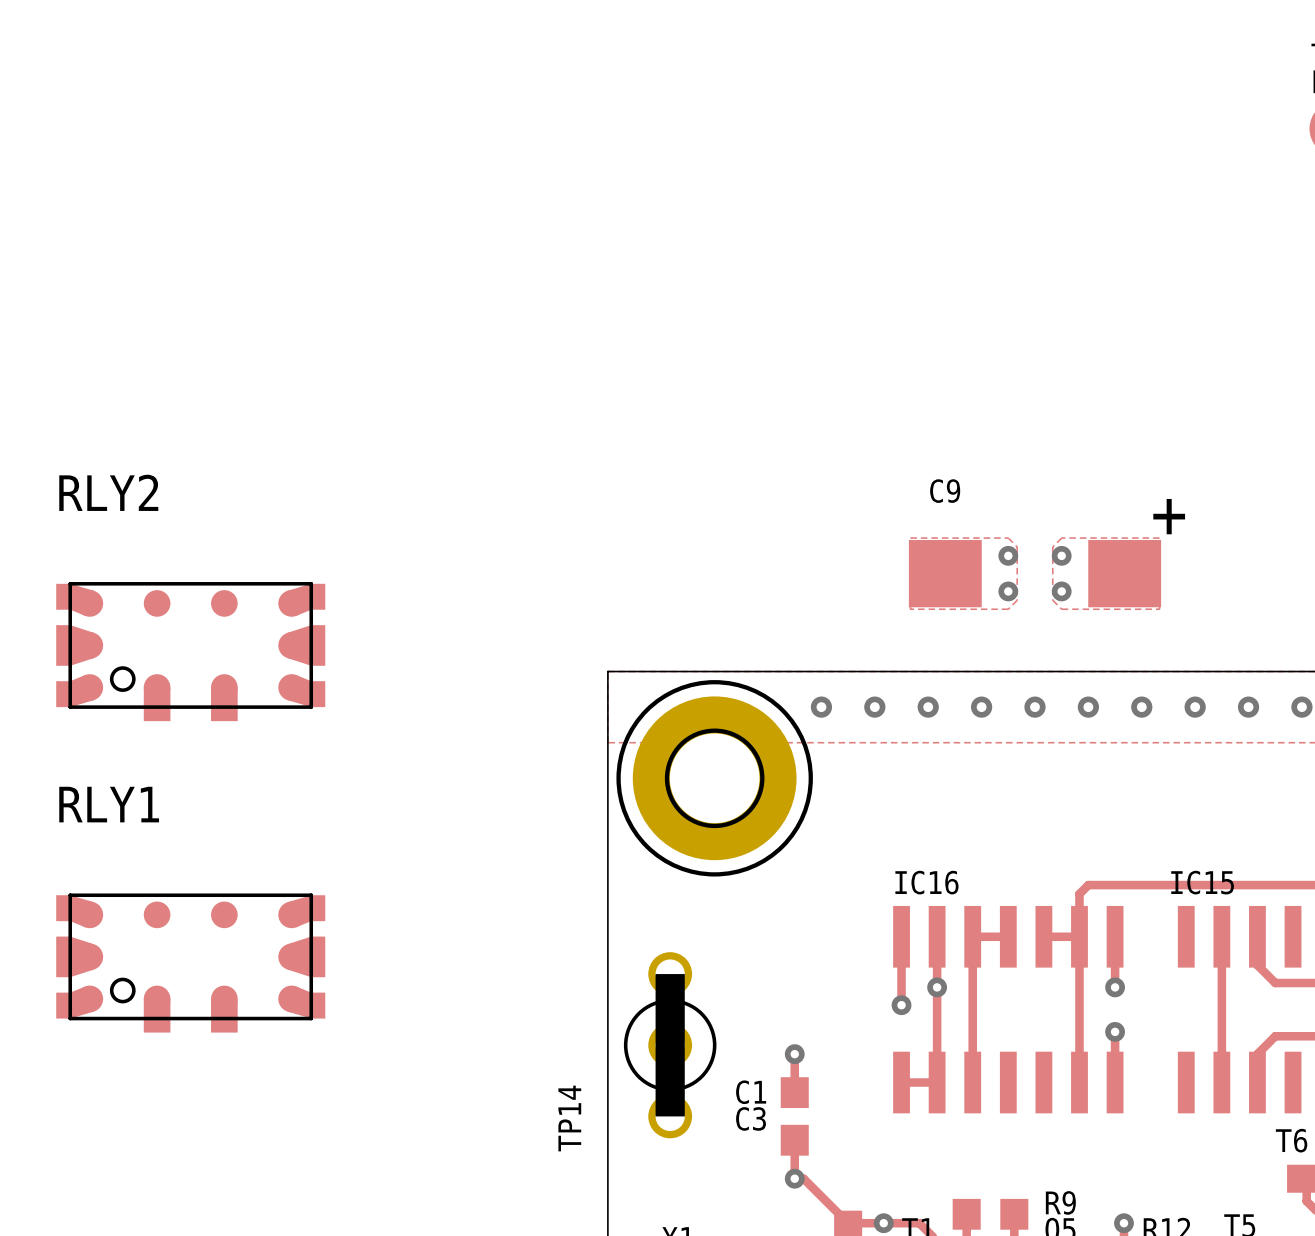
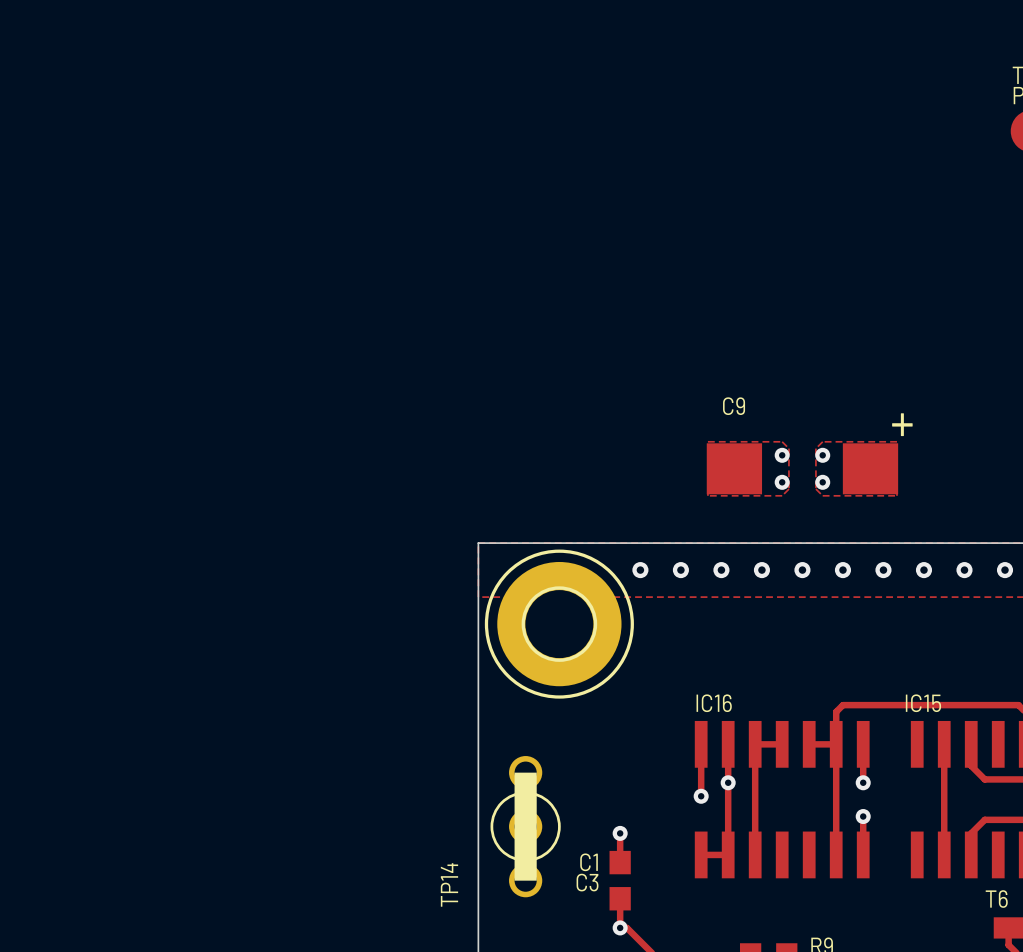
RLY2: (190, 651) -> none
RLY1: (190, 963) -> none

